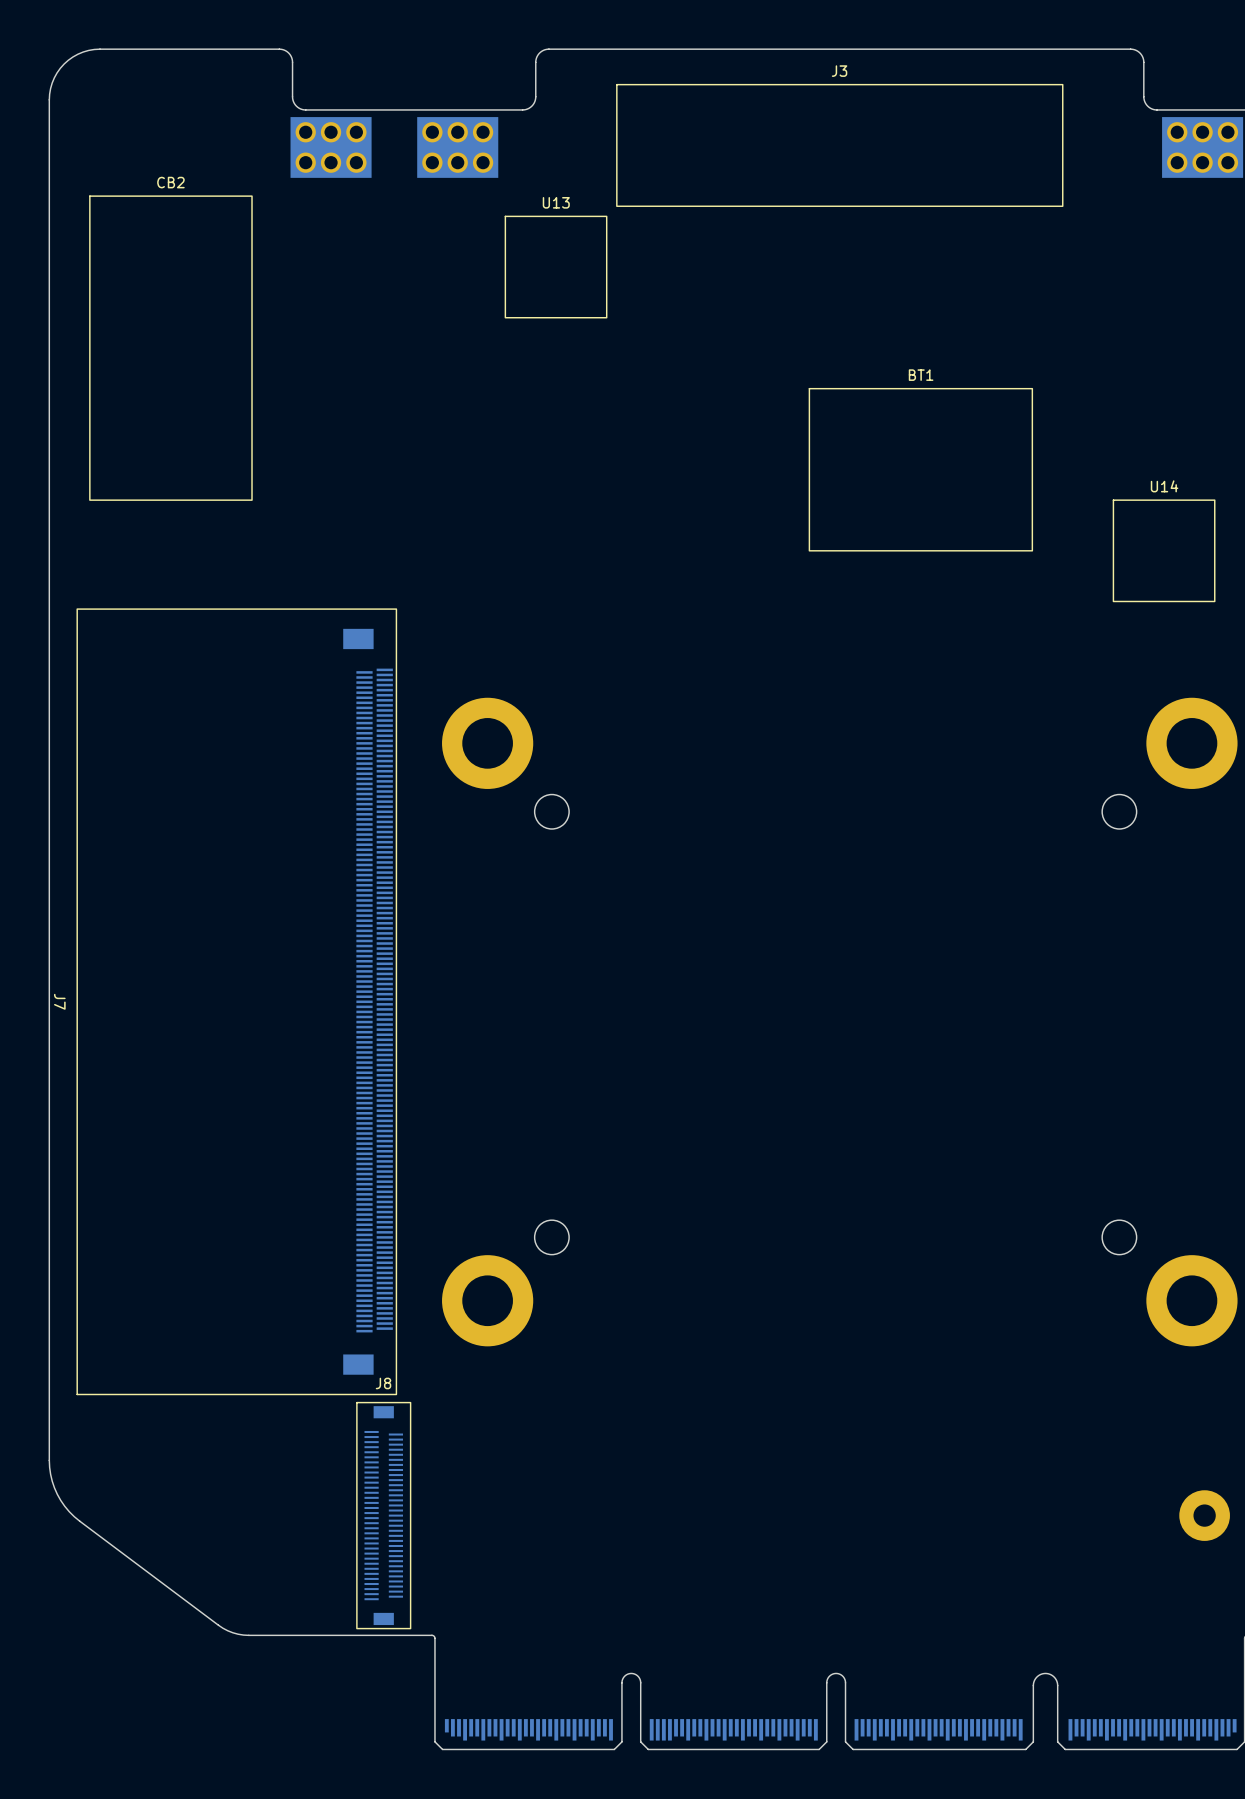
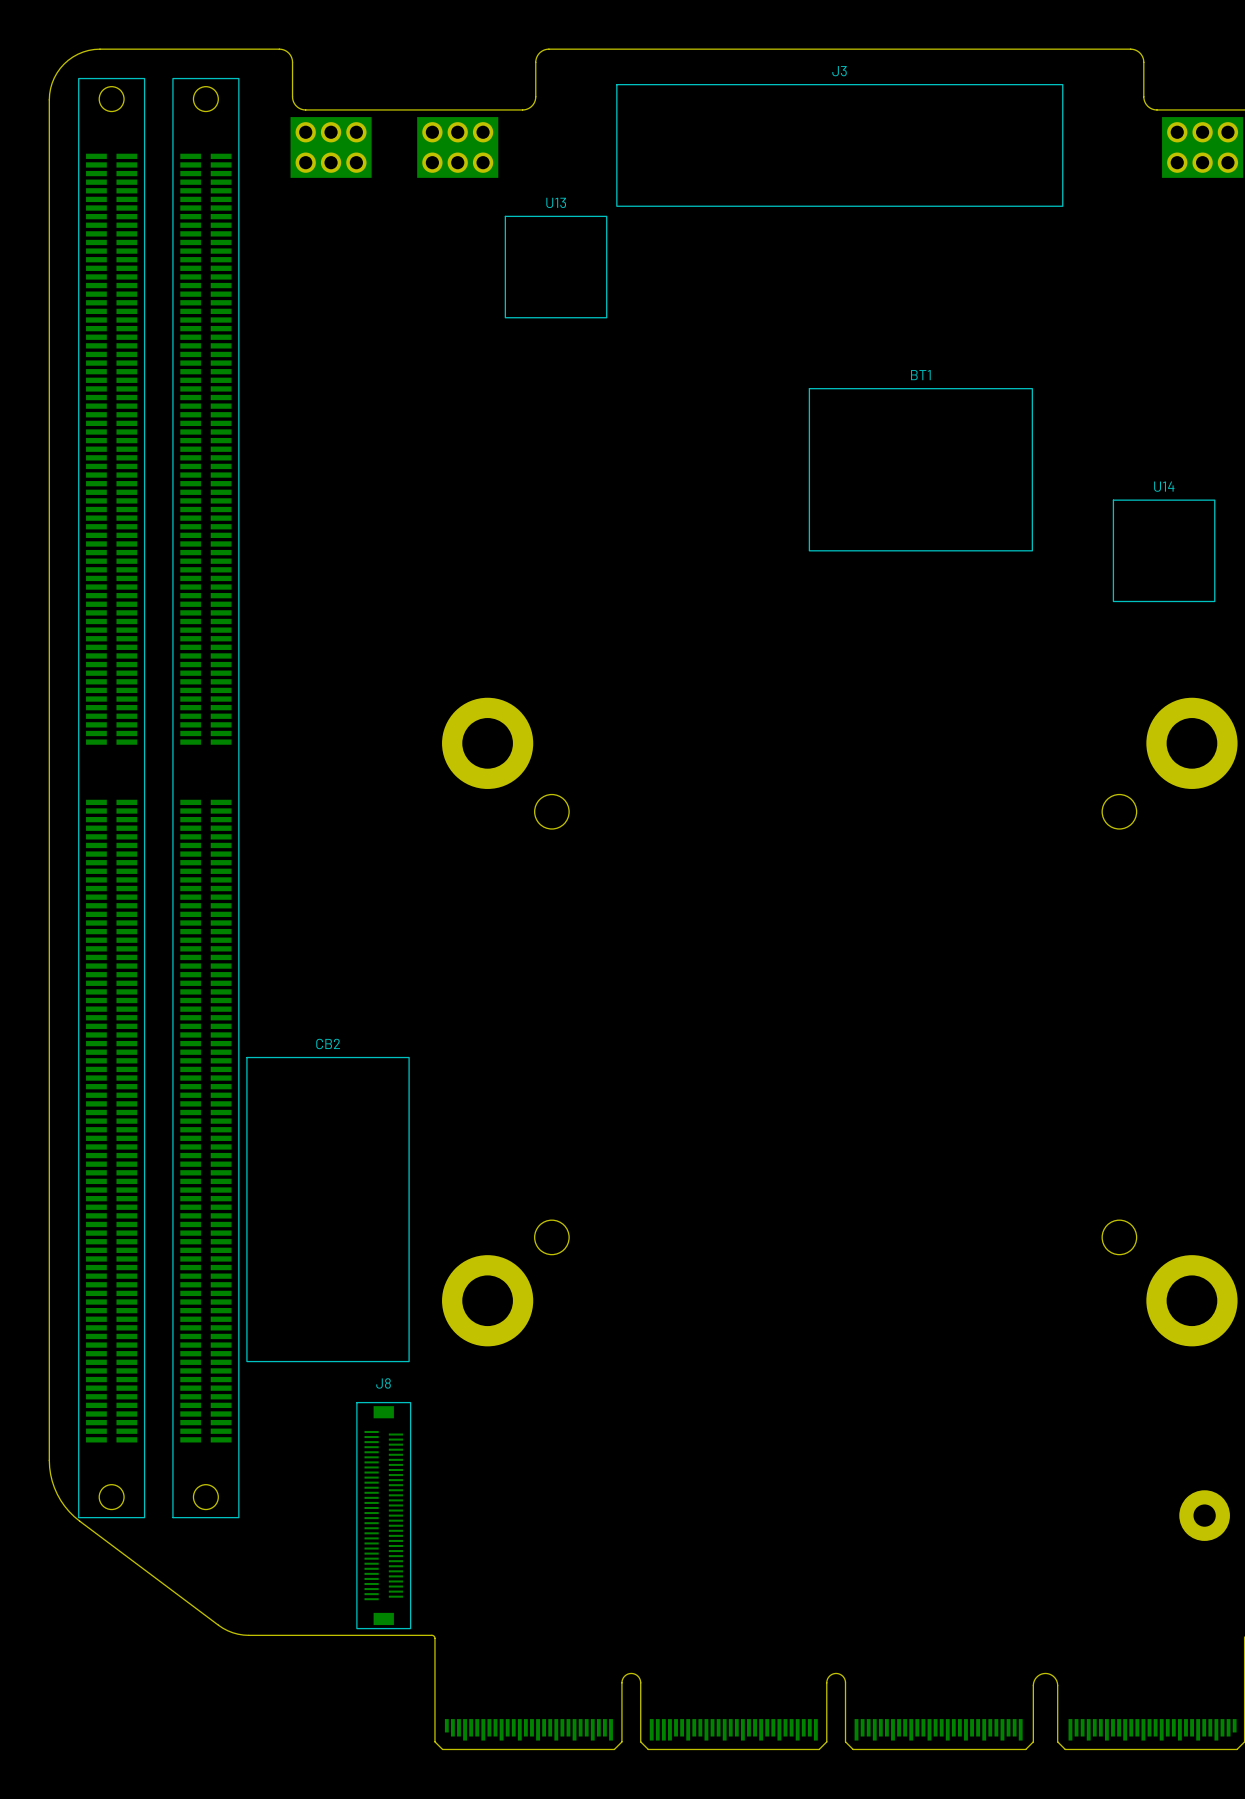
CB2 position: (170, 348) -> (328, 1209)
part: none -> (111, 798)
part: none -> (205, 798)
J7: (236, 1001) -> none

